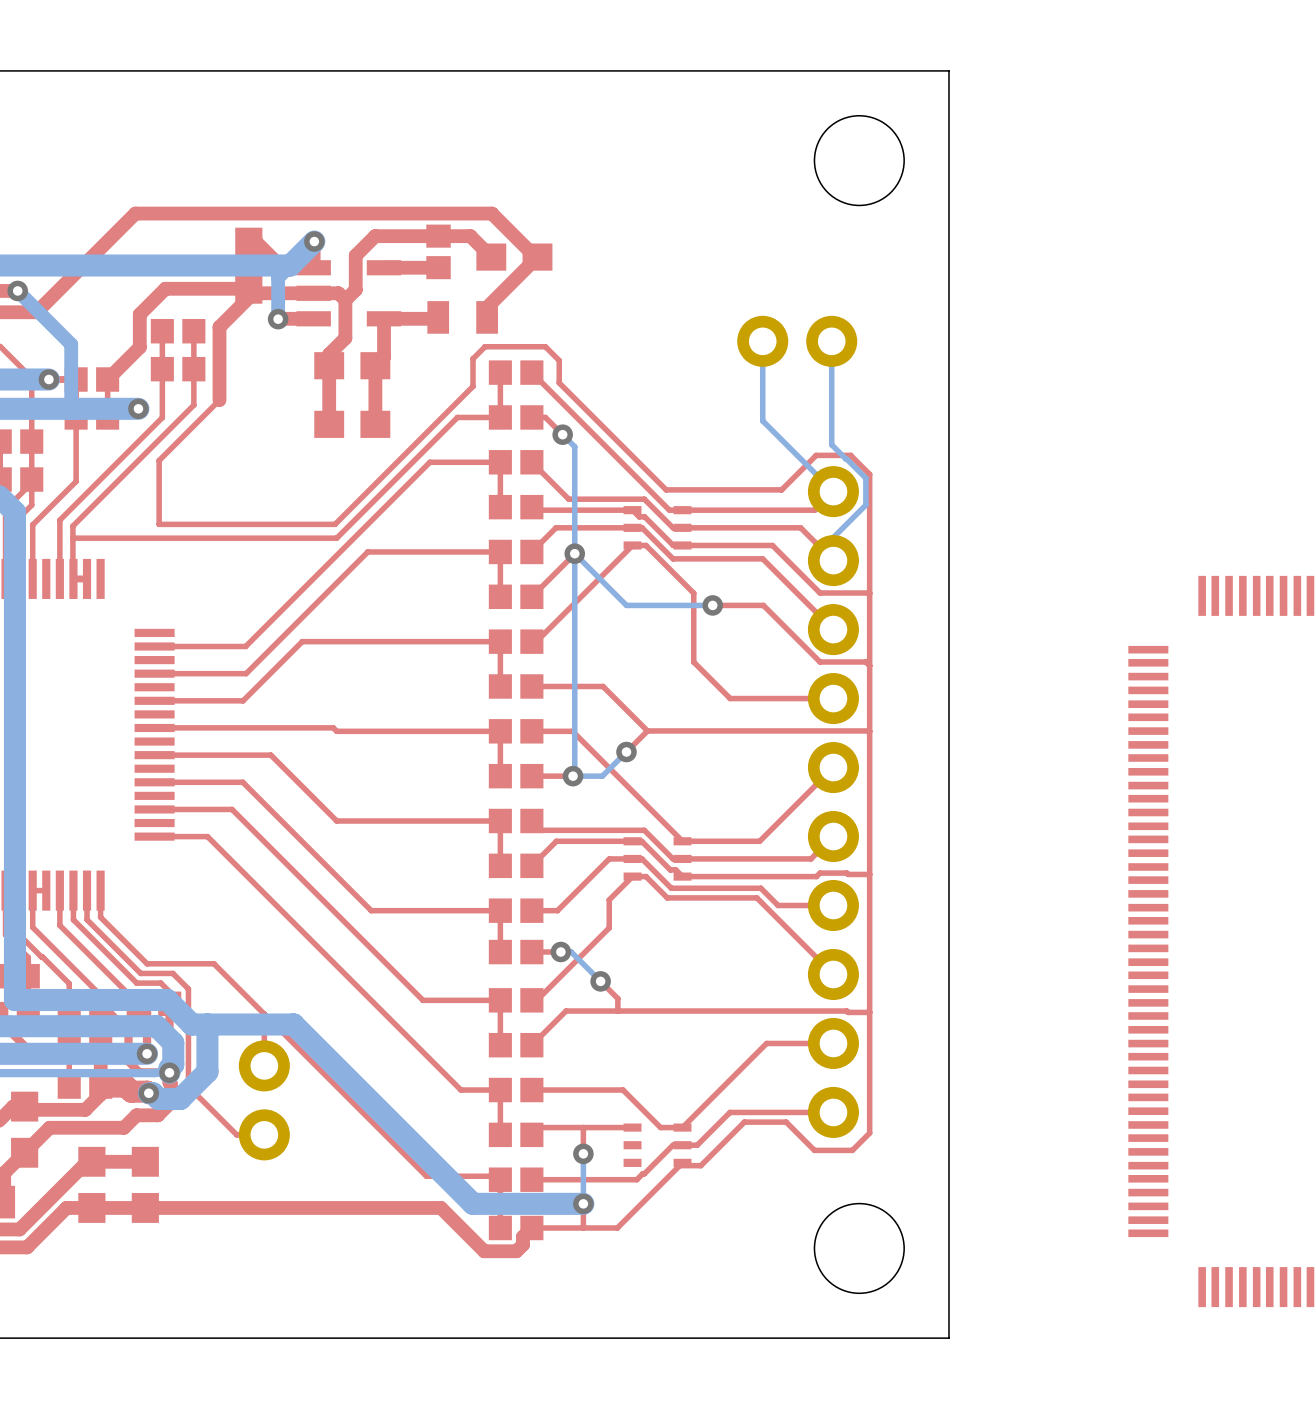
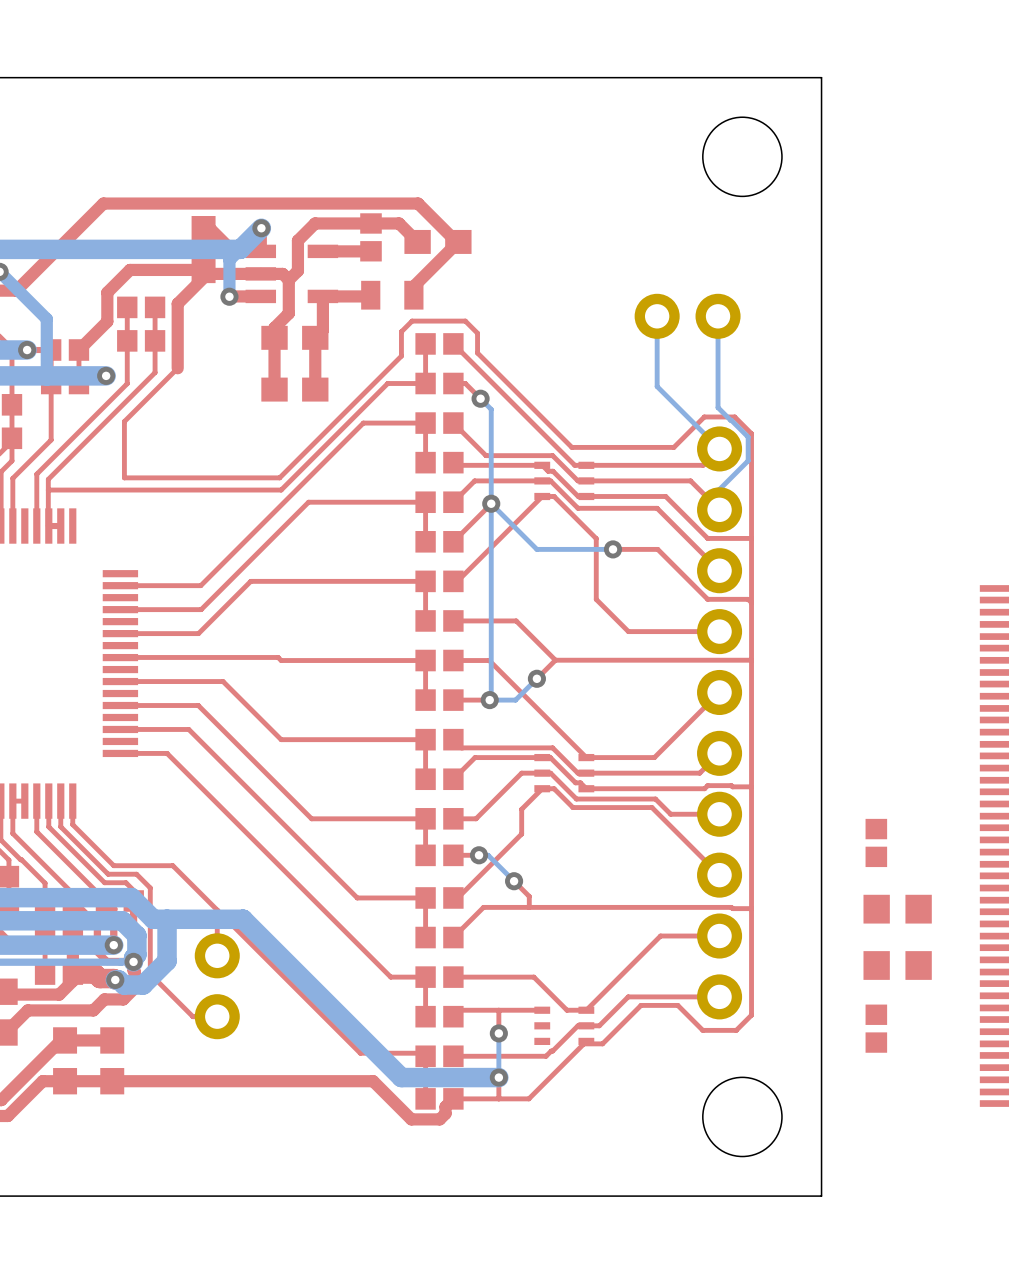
part: none -> (876, 842)
part: none -> (897, 937)
part: none -> (876, 1028)

